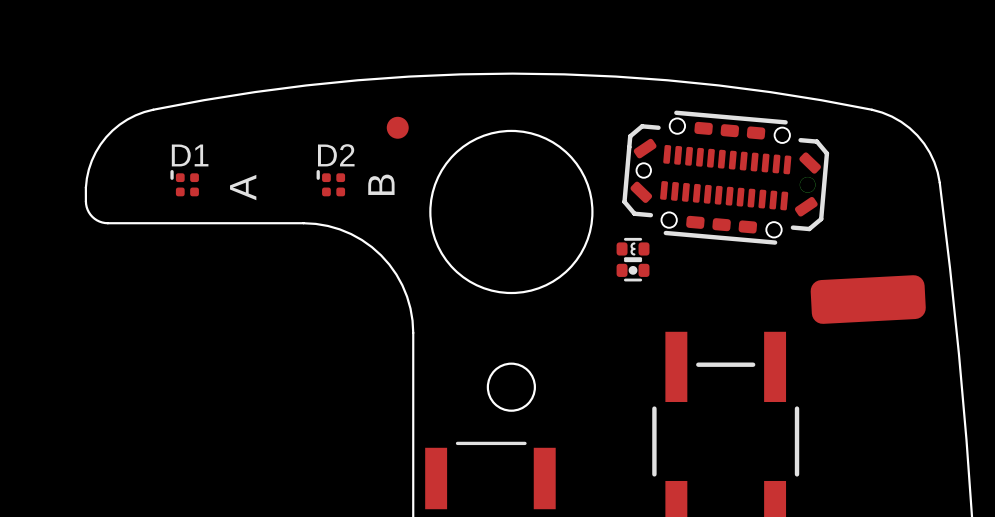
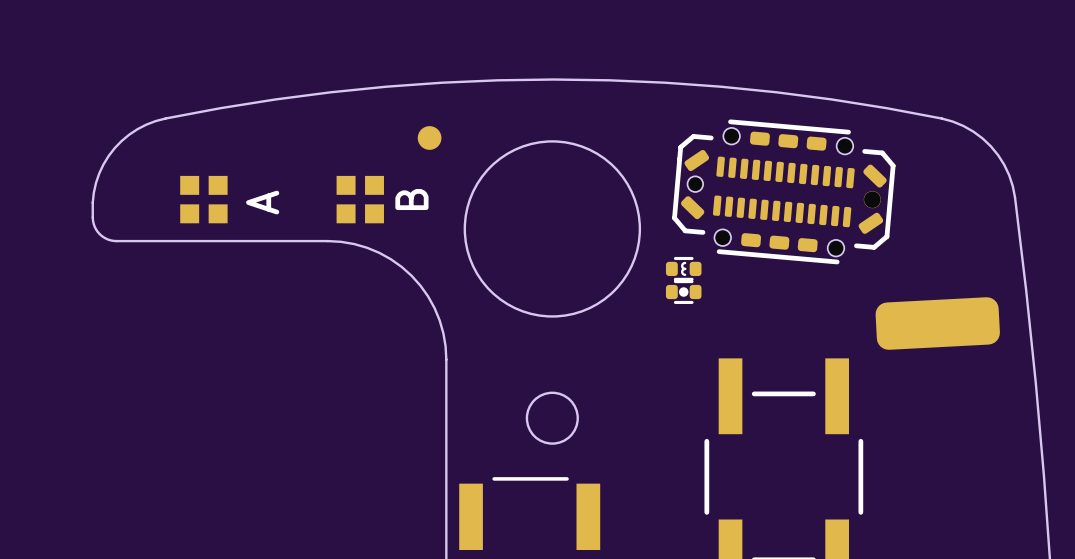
D1: (184, 183) -> none
D2: (330, 183) -> none
part: none -> (203, 199)
part: none -> (360, 199)

